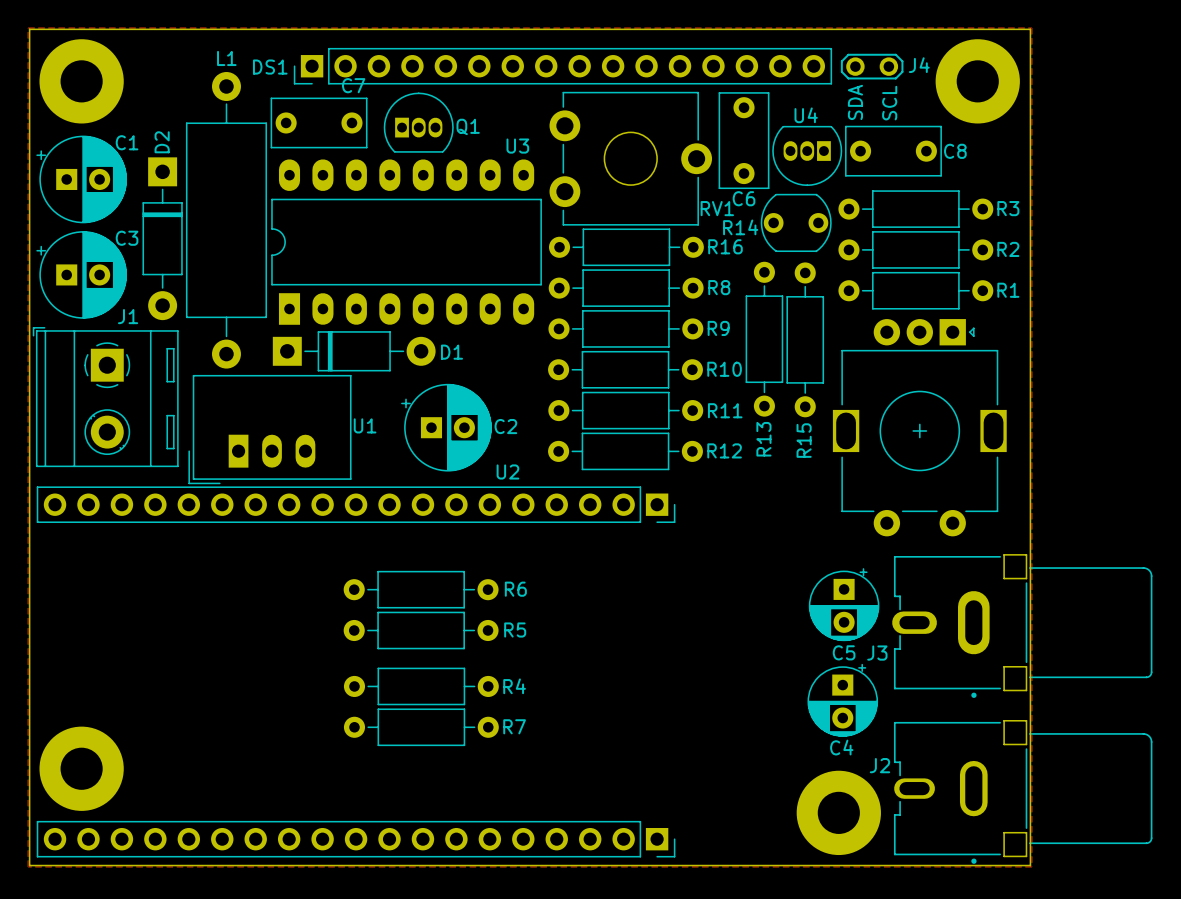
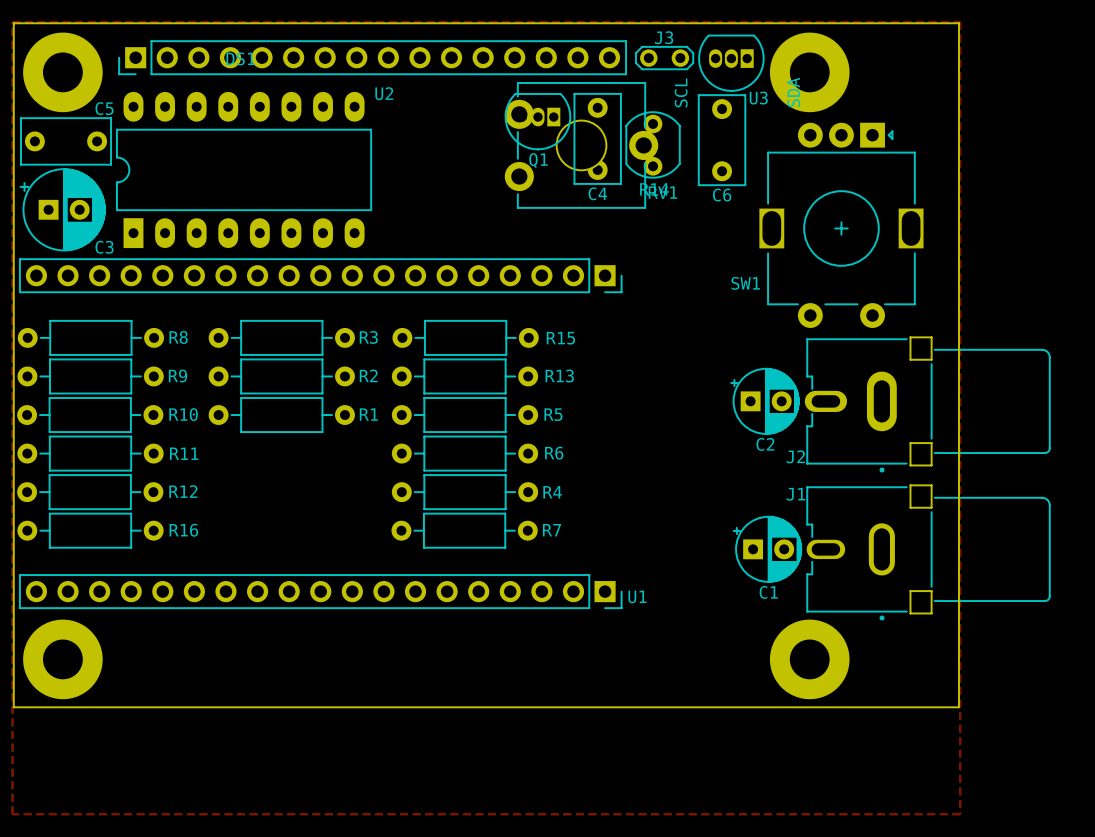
DS1 position: (562, 66) -> (372, 57)
J4: (872, 66) -> none
part position: (977, 81) -> (809, 72)
text position: SCL (889, 103) -> SCL (681, 92)
C7: (319, 122) -> none
Q1 rotation: 0° (418, 122) -> 180° (537, 121)
Q1 position: (418, 122) -> (537, 121)
Q1 name position: Q1 (468, 126) -> Q1 (538, 160)
C1 footprint: [36, 135, 128, 224] -> [733, 516, 802, 583]
C6 position: (744, 140) -> (722, 140)
C1 name position: C1 (127, 142) -> C1 (768, 592)
U3 name position: U3 (517, 146) -> U3 (758, 98)
C8: (893, 151) -> none
U4: (807, 155) -> none
U3 footprint: [271, 159, 542, 325] -> [698, 34, 765, 92]
R3 position: (915, 209) -> (281, 337)
L1: (226, 220) -> none
R14 rotation: 0° (796, 223) -> 90° counterclockwise (653, 144)
R14 position: (796, 223) -> (653, 144)
C3 name position: C3 (127, 238) -> C3 (104, 247)
D2: (162, 238) -> none
SW1: none -> (841, 225)
R16 position: (626, 247) -> (90, 530)
R2 position: (915, 249) -> (281, 376)
C3 position: (81, 274) -> (62, 209)
R8 position: (626, 288) -> (90, 337)
R1 position: (915, 290) -> (281, 415)
J1 name position: J1 (128, 316) -> J1 (795, 494)
J1 footprint: [32, 327, 179, 468] -> [806, 485, 1051, 621]
R9 position: (625, 328) -> (90, 376)
R13 rotation: 0° (764, 339) -> 90° clockwise (464, 376)
R13 position: (764, 339) -> (464, 376)
R15 rotation: 0° (805, 339) -> 90° clockwise (465, 337)
R15 position: (805, 339) -> (465, 337)
D1: (354, 351) -> none
R10 position: (625, 369) -> (90, 415)
U1 footprint: [188, 374, 352, 485] -> [19, 258, 623, 609]
C2 footprint: [401, 383, 492, 472] -> [730, 368, 800, 435]
R11 position: (625, 410) -> (90, 453)
U1 name position: U1 (365, 425) -> U1 (637, 596)
C2 name position: C2 (505, 426) -> C2 (765, 444)
part: (919, 427) -> none
R13 name position: R13 (763, 439) -> R13 (559, 376)
R15 name position: R15 (804, 440) -> R15 (560, 338)
R12 position: (625, 451) -> (90, 492)
U2 name position: U2 (507, 471) -> U2 (384, 93)
U2 footprint: [36, 486, 676, 858] -> [116, 91, 372, 249]
J3 footprint: [892, 554, 1153, 698] -> [635, 45, 695, 71]
C5 footprint: [808, 568, 880, 642] -> [20, 117, 112, 166]
R6 position: (421, 589) -> (464, 453)
R5 position: (421, 630) -> (464, 415)
C5 name position: C5 (844, 652) -> C5 (104, 108)
J3 name position: J3 (877, 653) -> J3 (664, 37)
C4 footprint: [807, 663, 879, 737] -> [573, 93, 622, 185]
R4 position: (421, 686) -> (464, 492)
J2 footprint: [893, 720, 1153, 864] -> [804, 337, 1051, 473]
R7 position: (421, 727) -> (464, 530)
board edge: (29, 753) (29, 865) (1030, 865) (1030, 753) -> (13, 707) (958, 707)
J2 name position: J2 (879, 765) -> J2 (795, 456)
part position: (81, 768) -> (62, 659)
part position: (838, 812) -> (809, 659)

